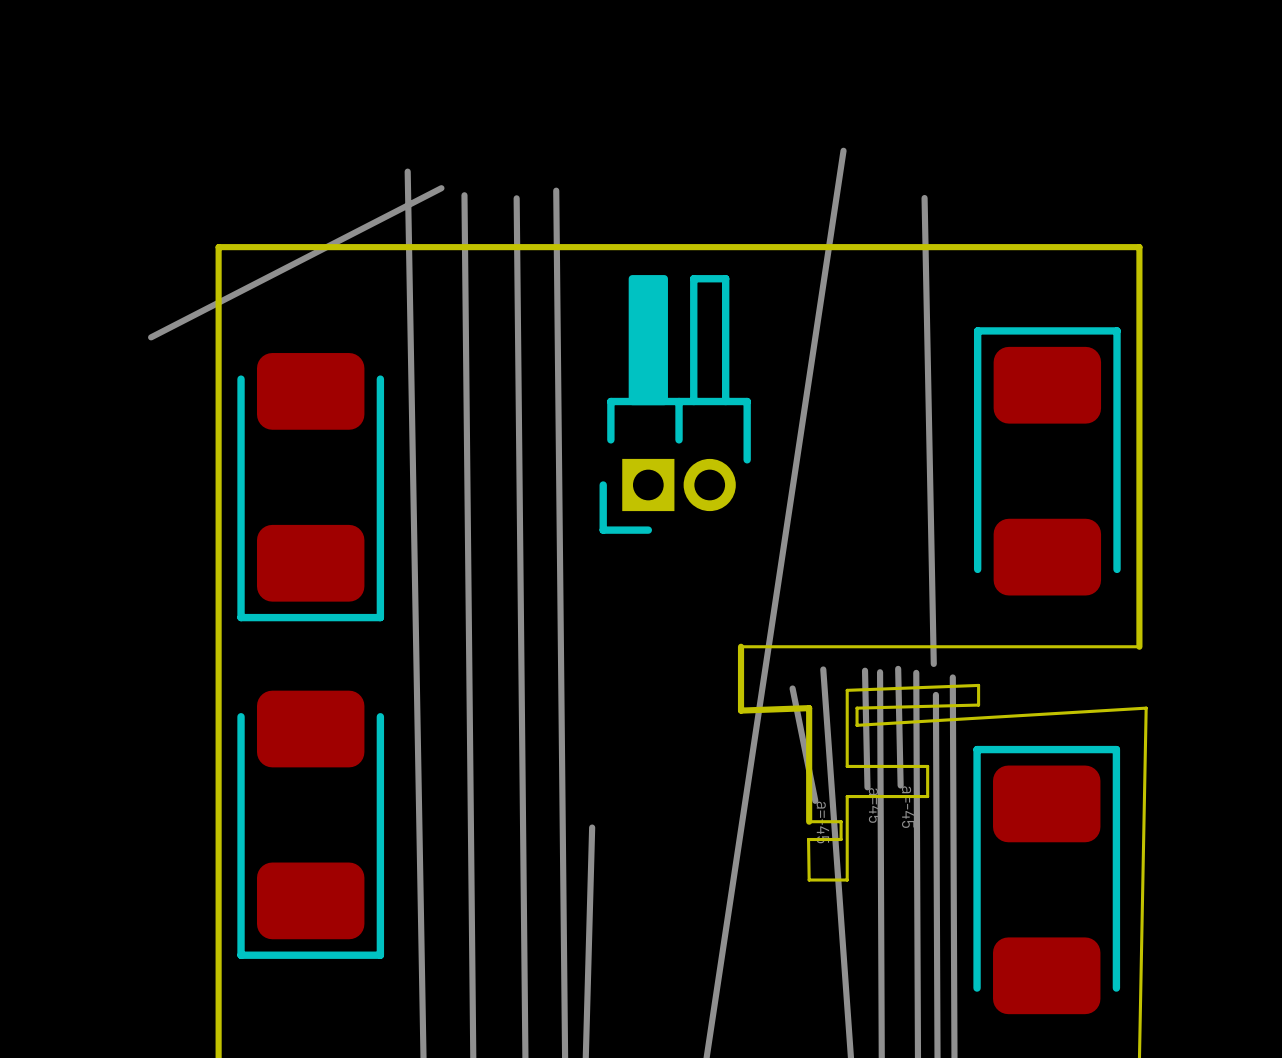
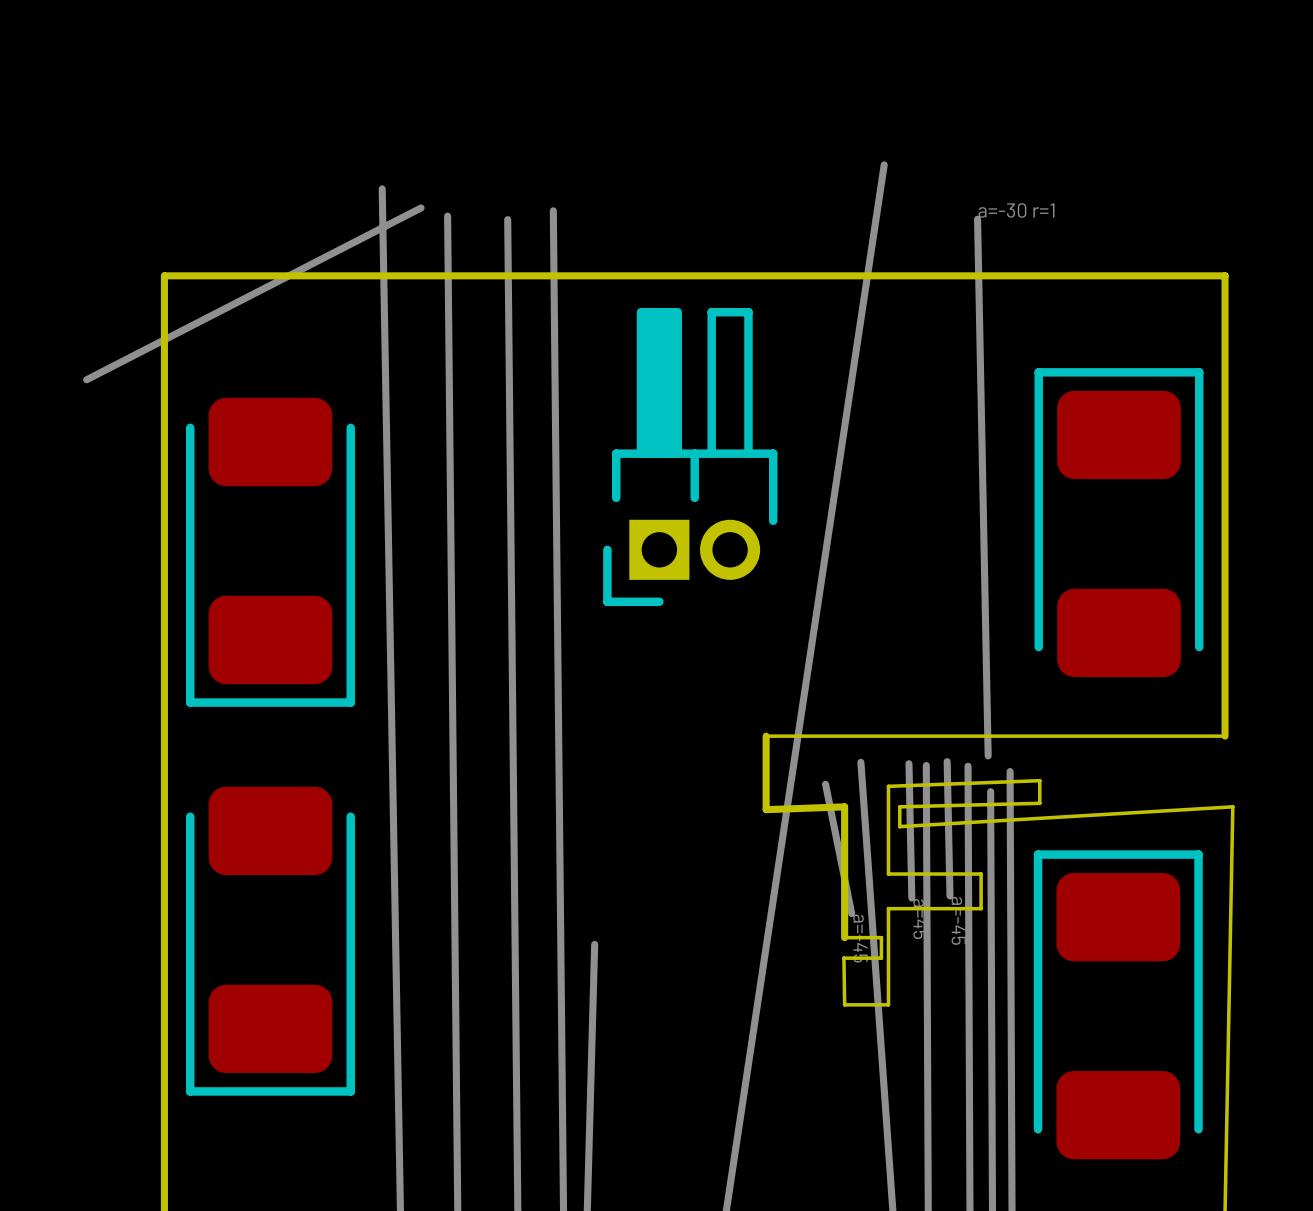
text: none -> a=-30 r=1 (1016, 210)

